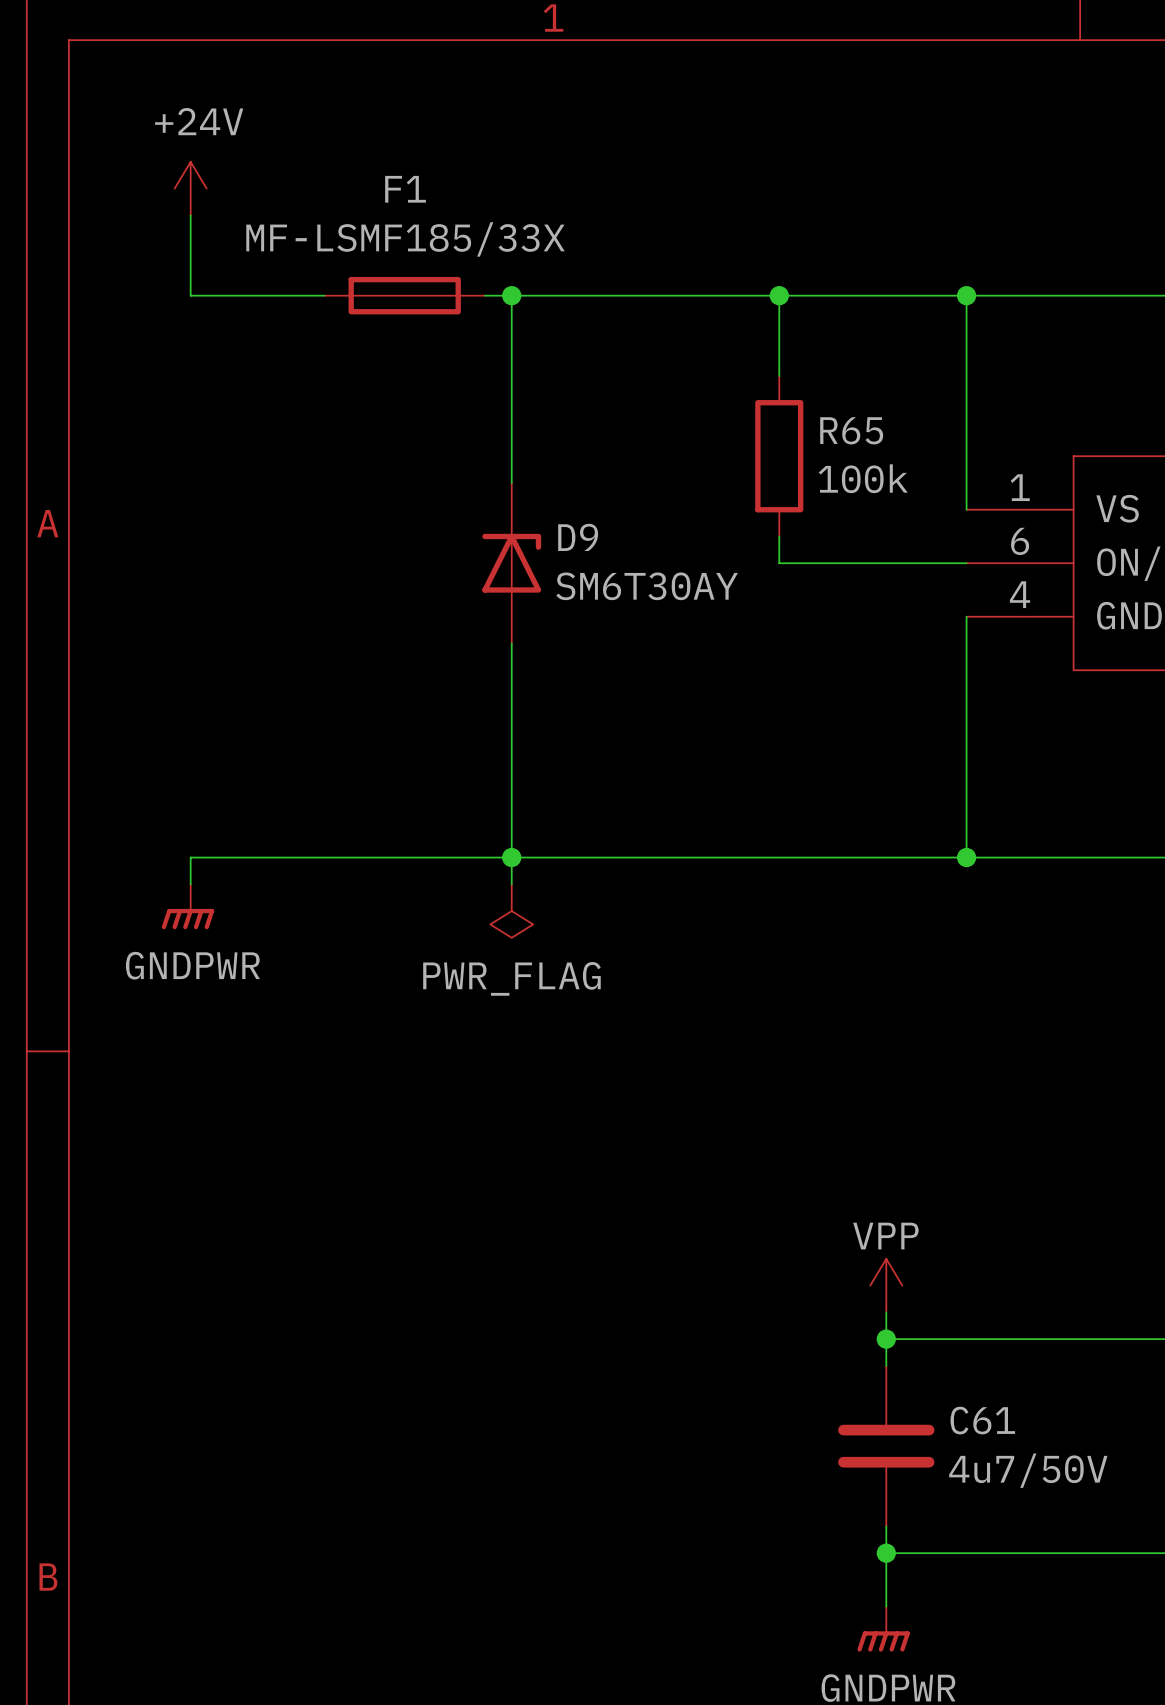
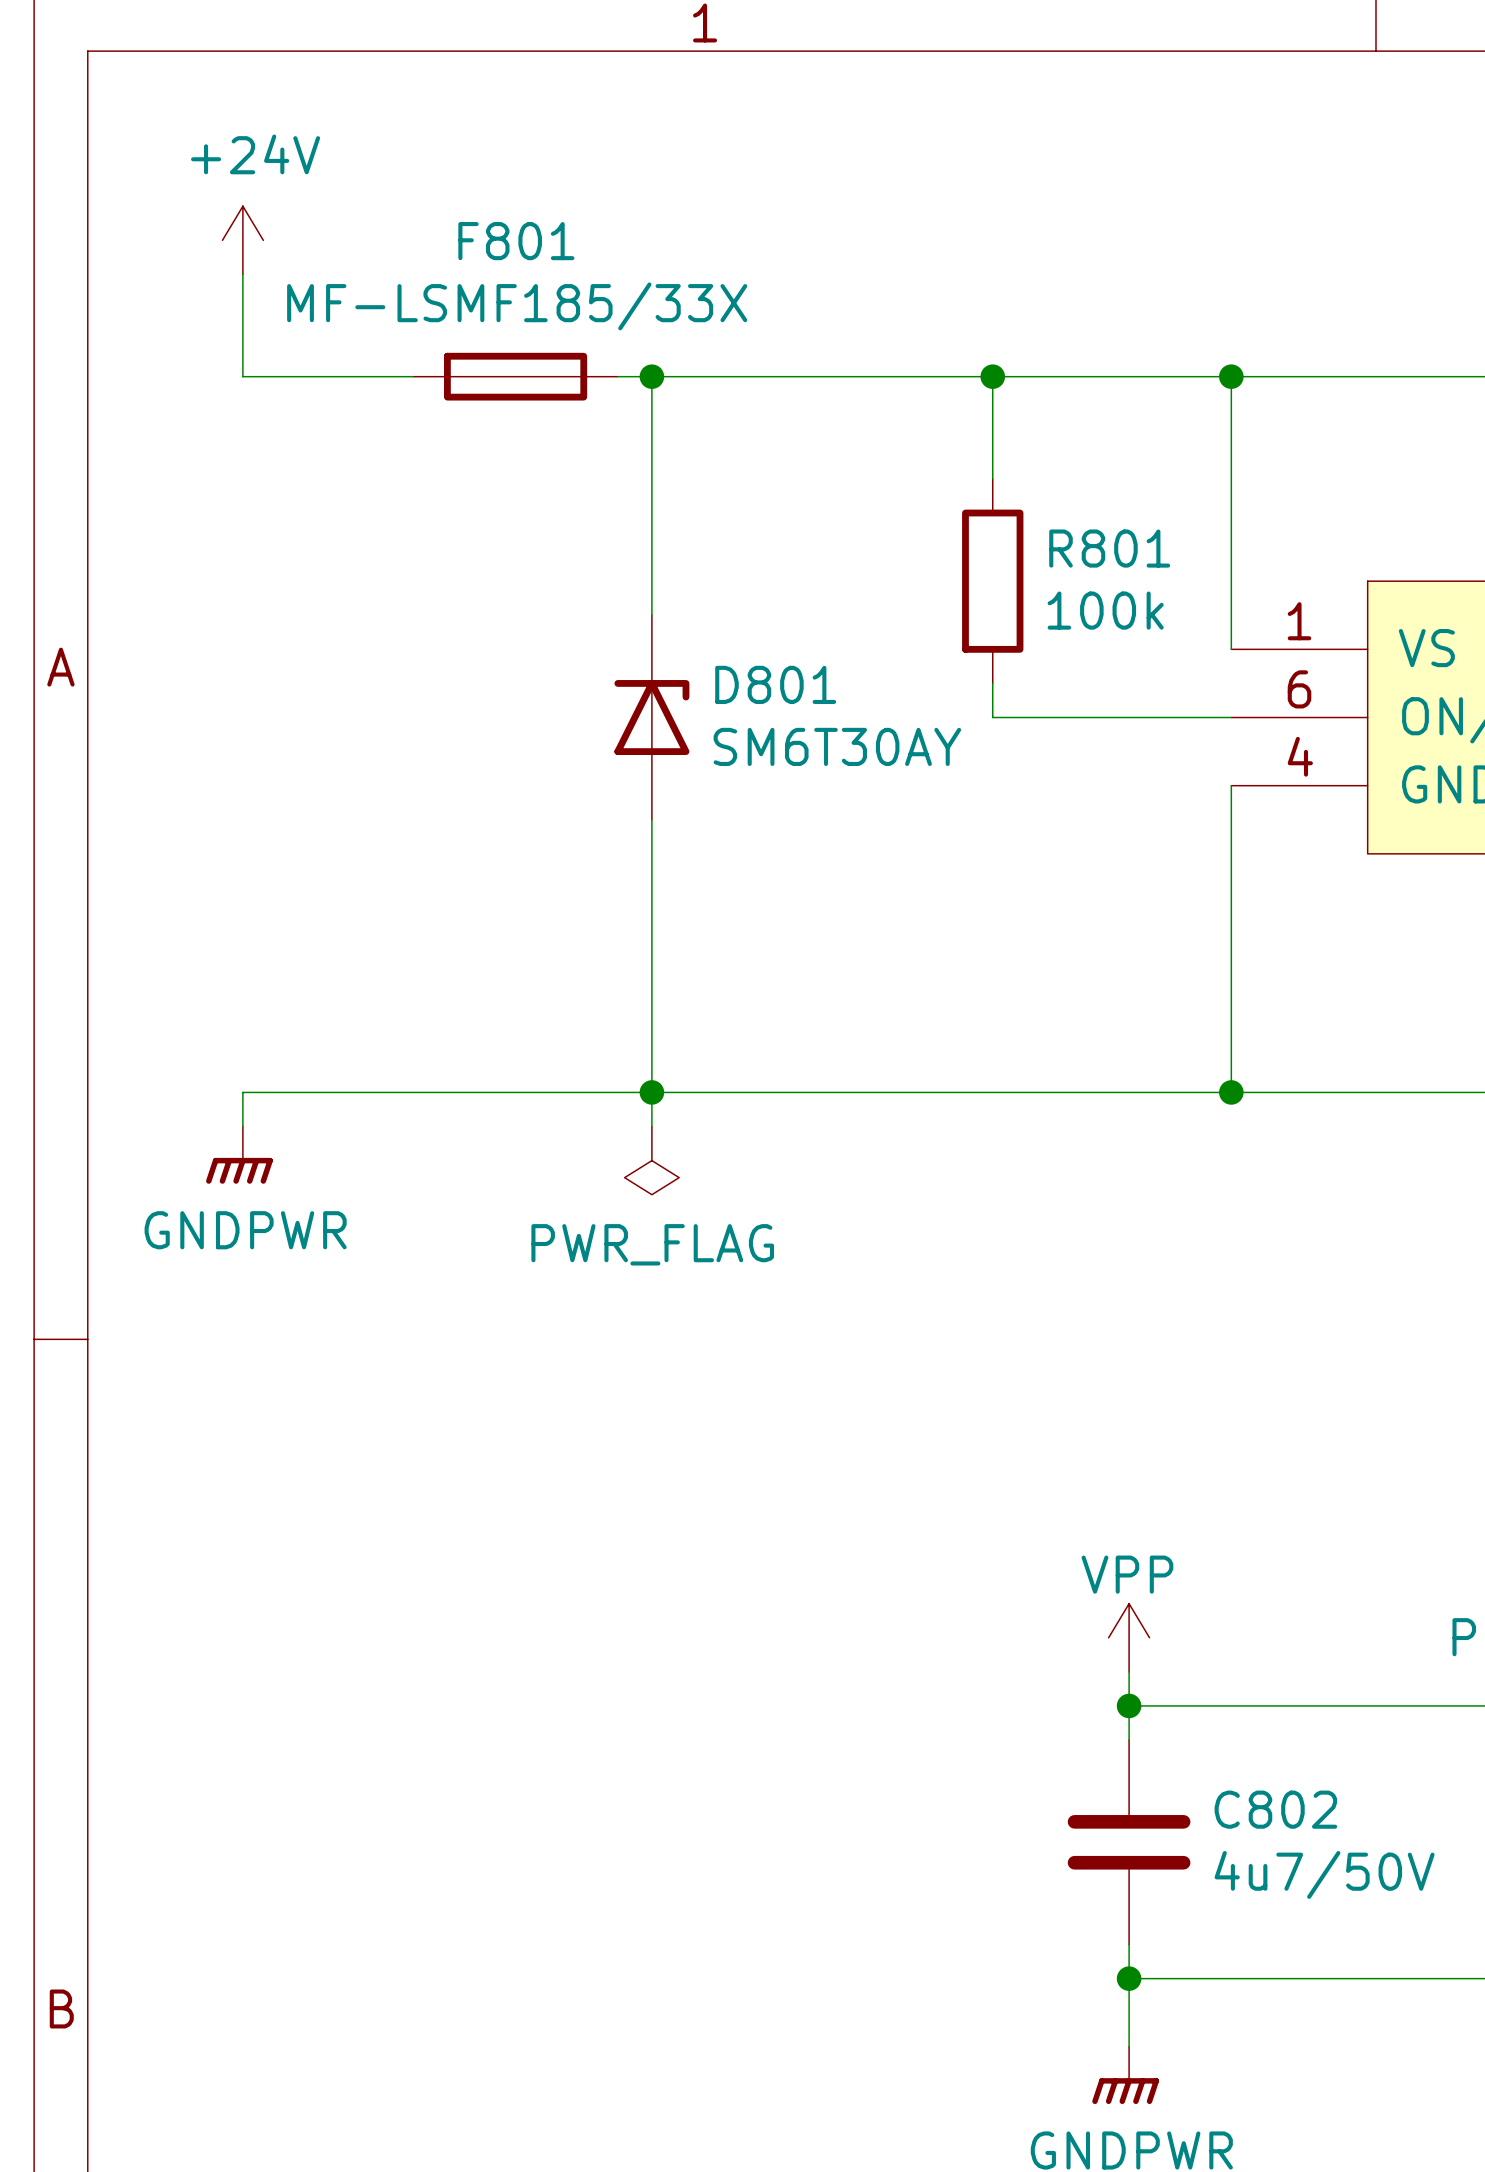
F1 name: F1 (405, 189) -> F801 (516, 241)
R65 name: R65 (851, 430) -> R801 (1109, 548)
D9 name: D9 (578, 537) -> D801 (775, 684)
C61 name: C61 (982, 1420) -> C802 (1275, 1809)

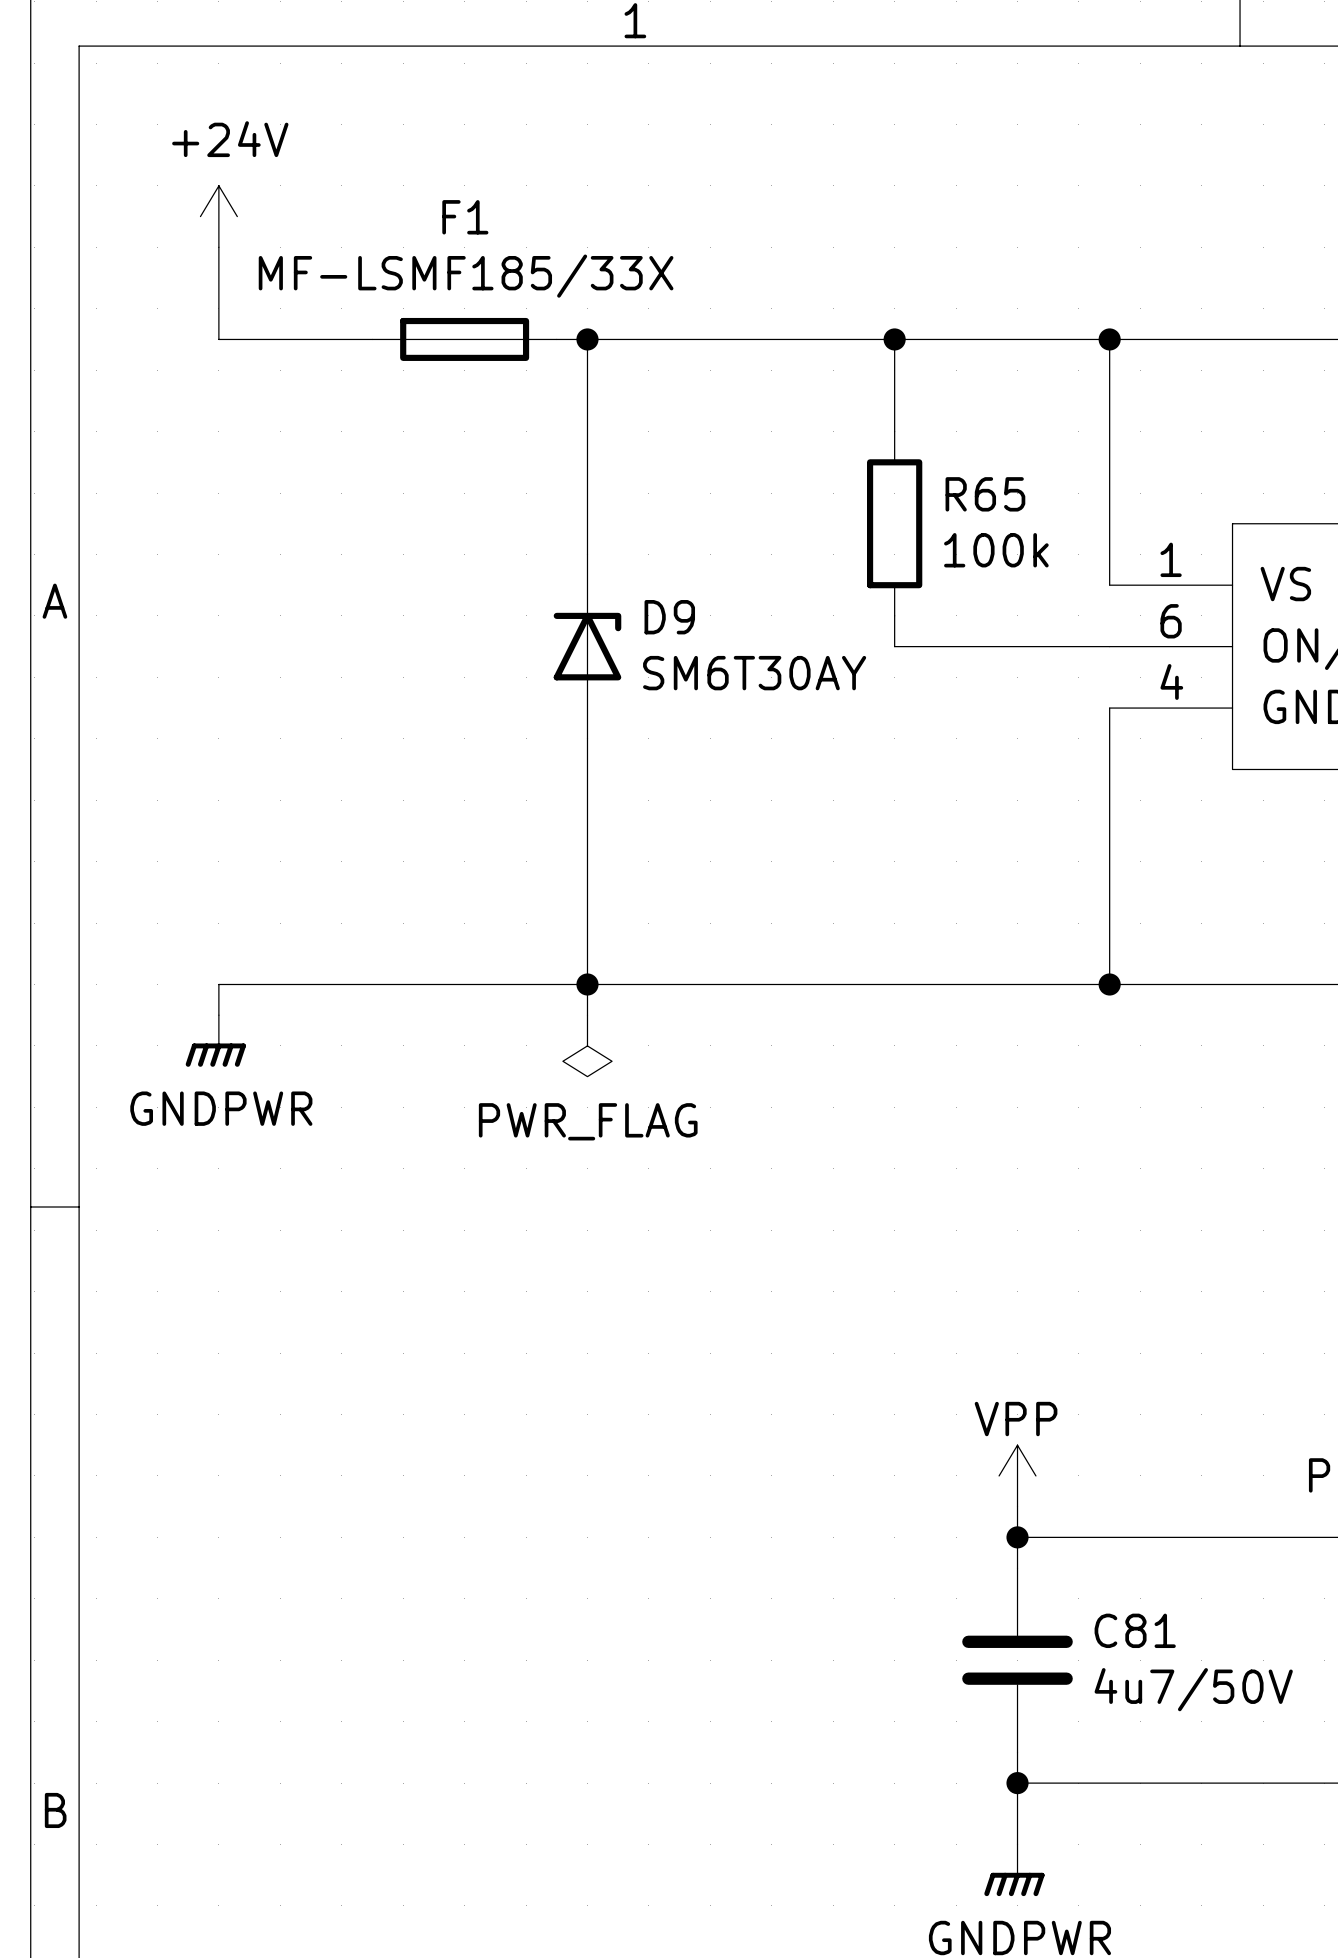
F801 name: F801 (516, 241) -> F1 (465, 217)
R801 name: R801 (1109, 548) -> R65 (985, 494)
D801 name: D801 (775, 684) -> D9 (669, 617)
C802 name: C802 (1275, 1809) -> C81 (1135, 1630)

